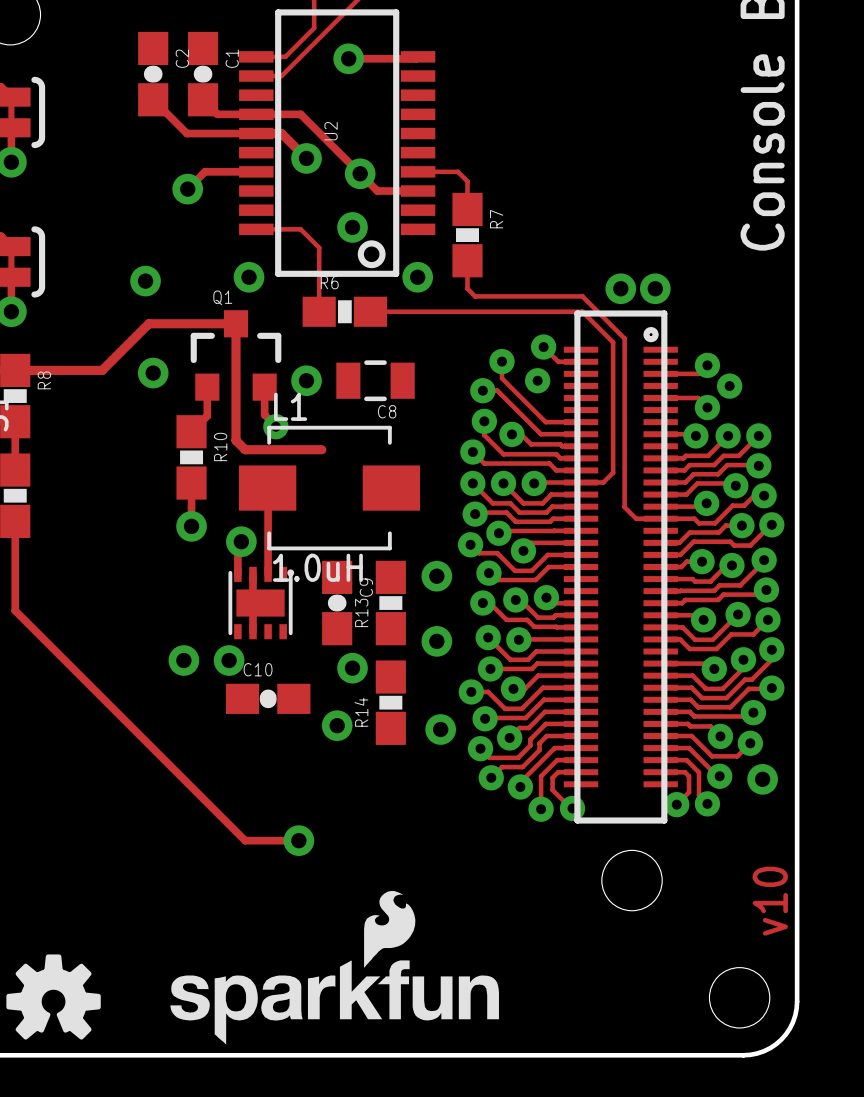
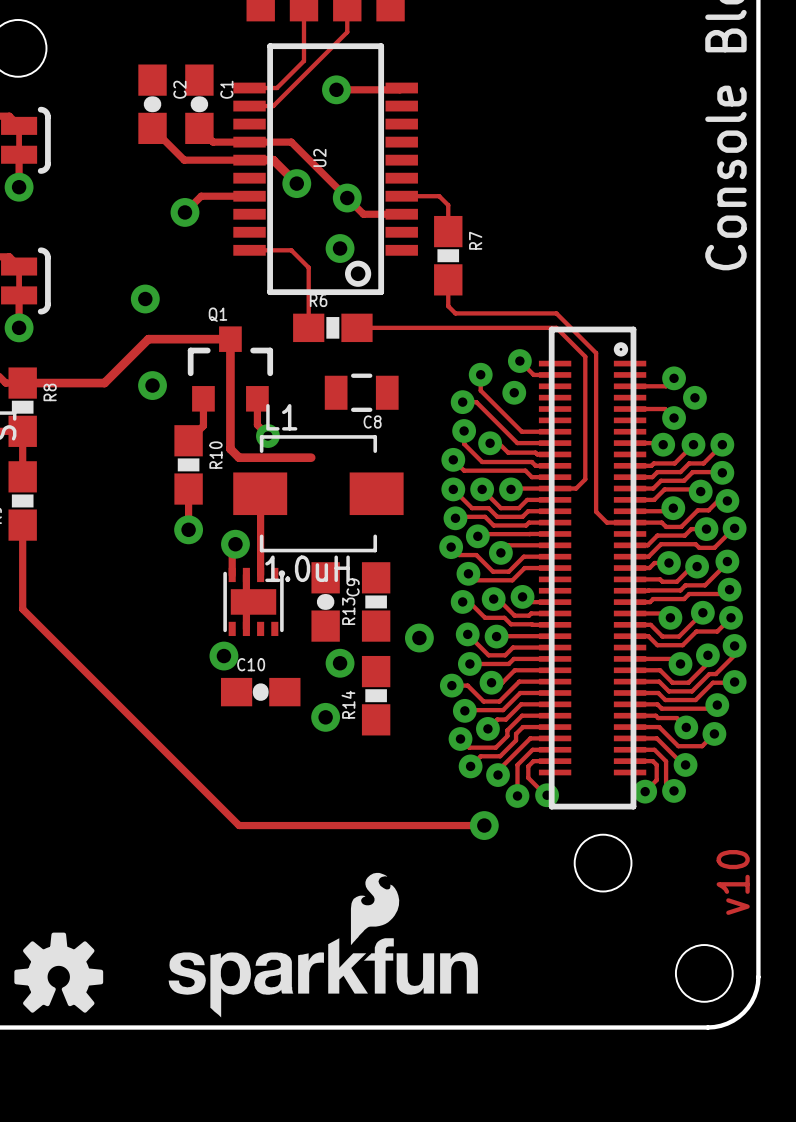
via: (249, 277) -> none
via: (417, 277) -> none
via: (620, 288) -> none
via: (655, 288) -> none
via: (306, 380) -> none
via: (436, 576) -> none
via: (183, 660) -> none
via: (440, 729) -> none
via: (762, 779) -> none
track: none -> (289, 825) (484, 825)
via: (298, 840) -> none
via: none -> (484, 825)

